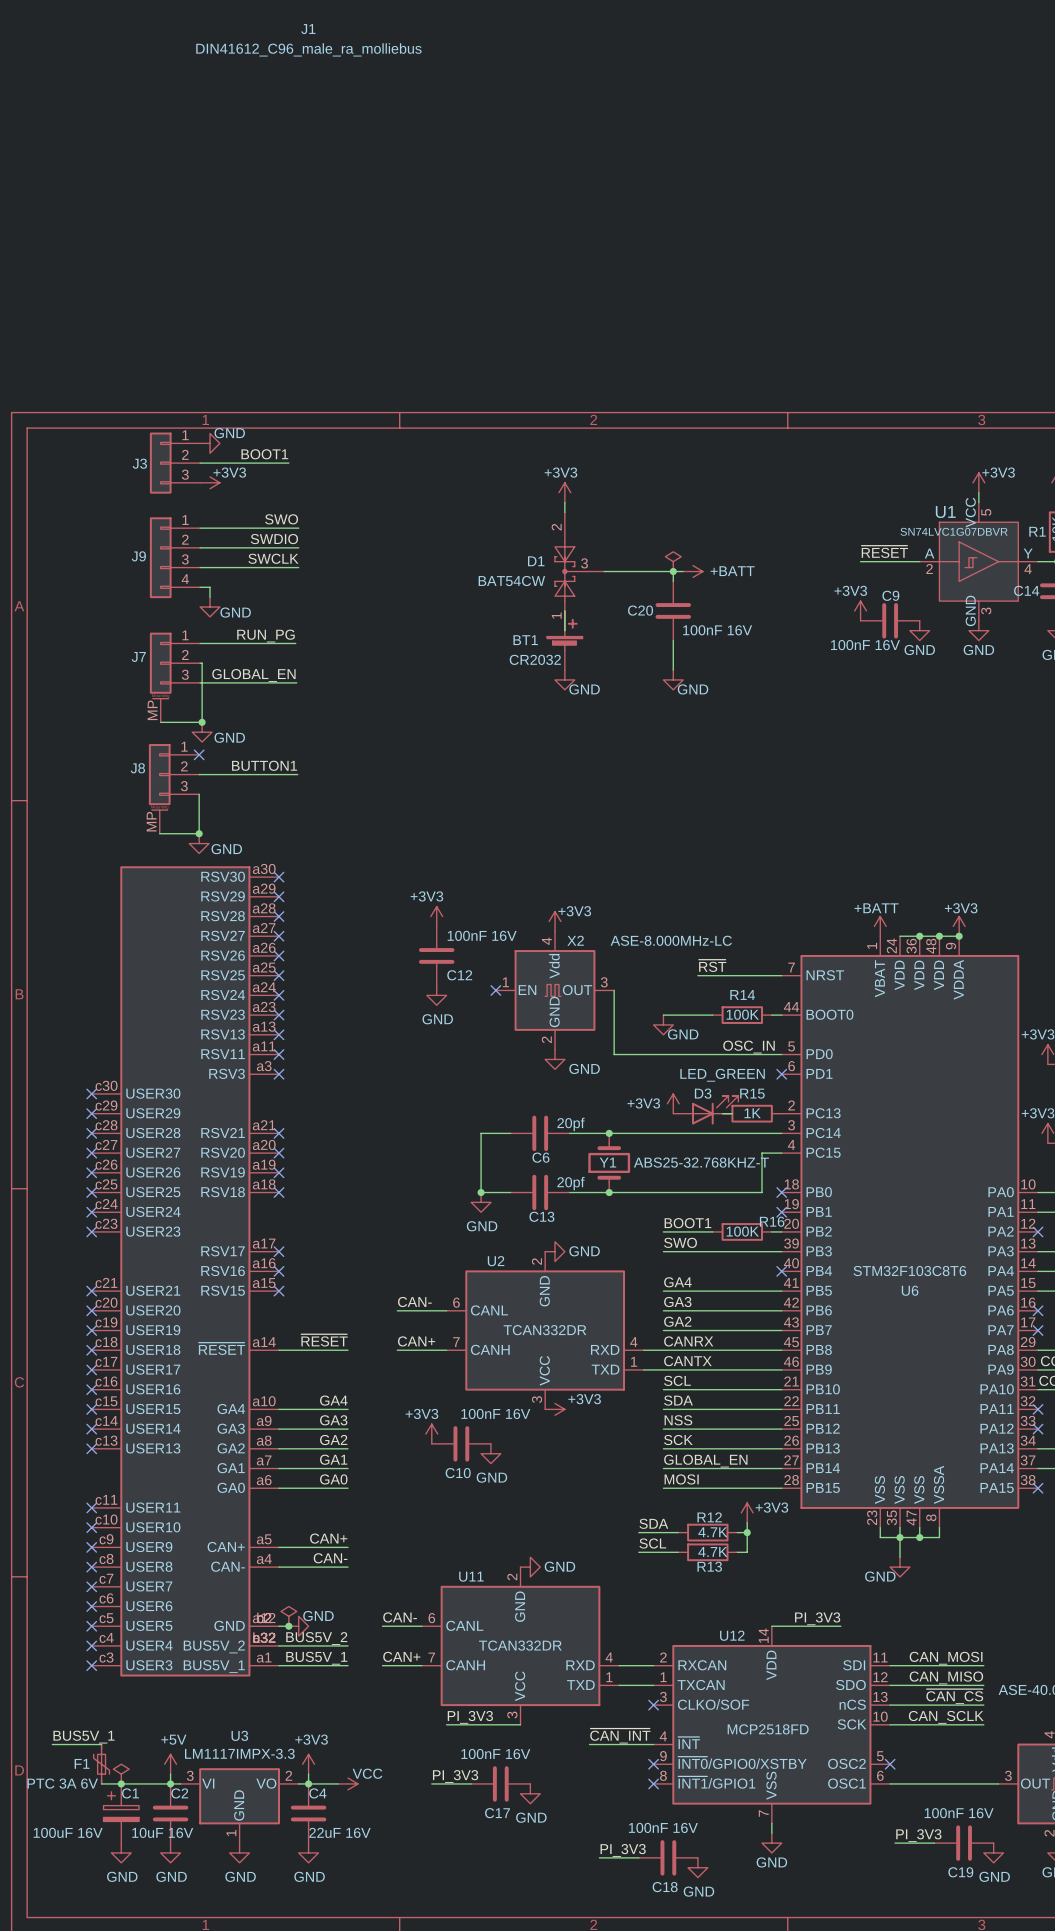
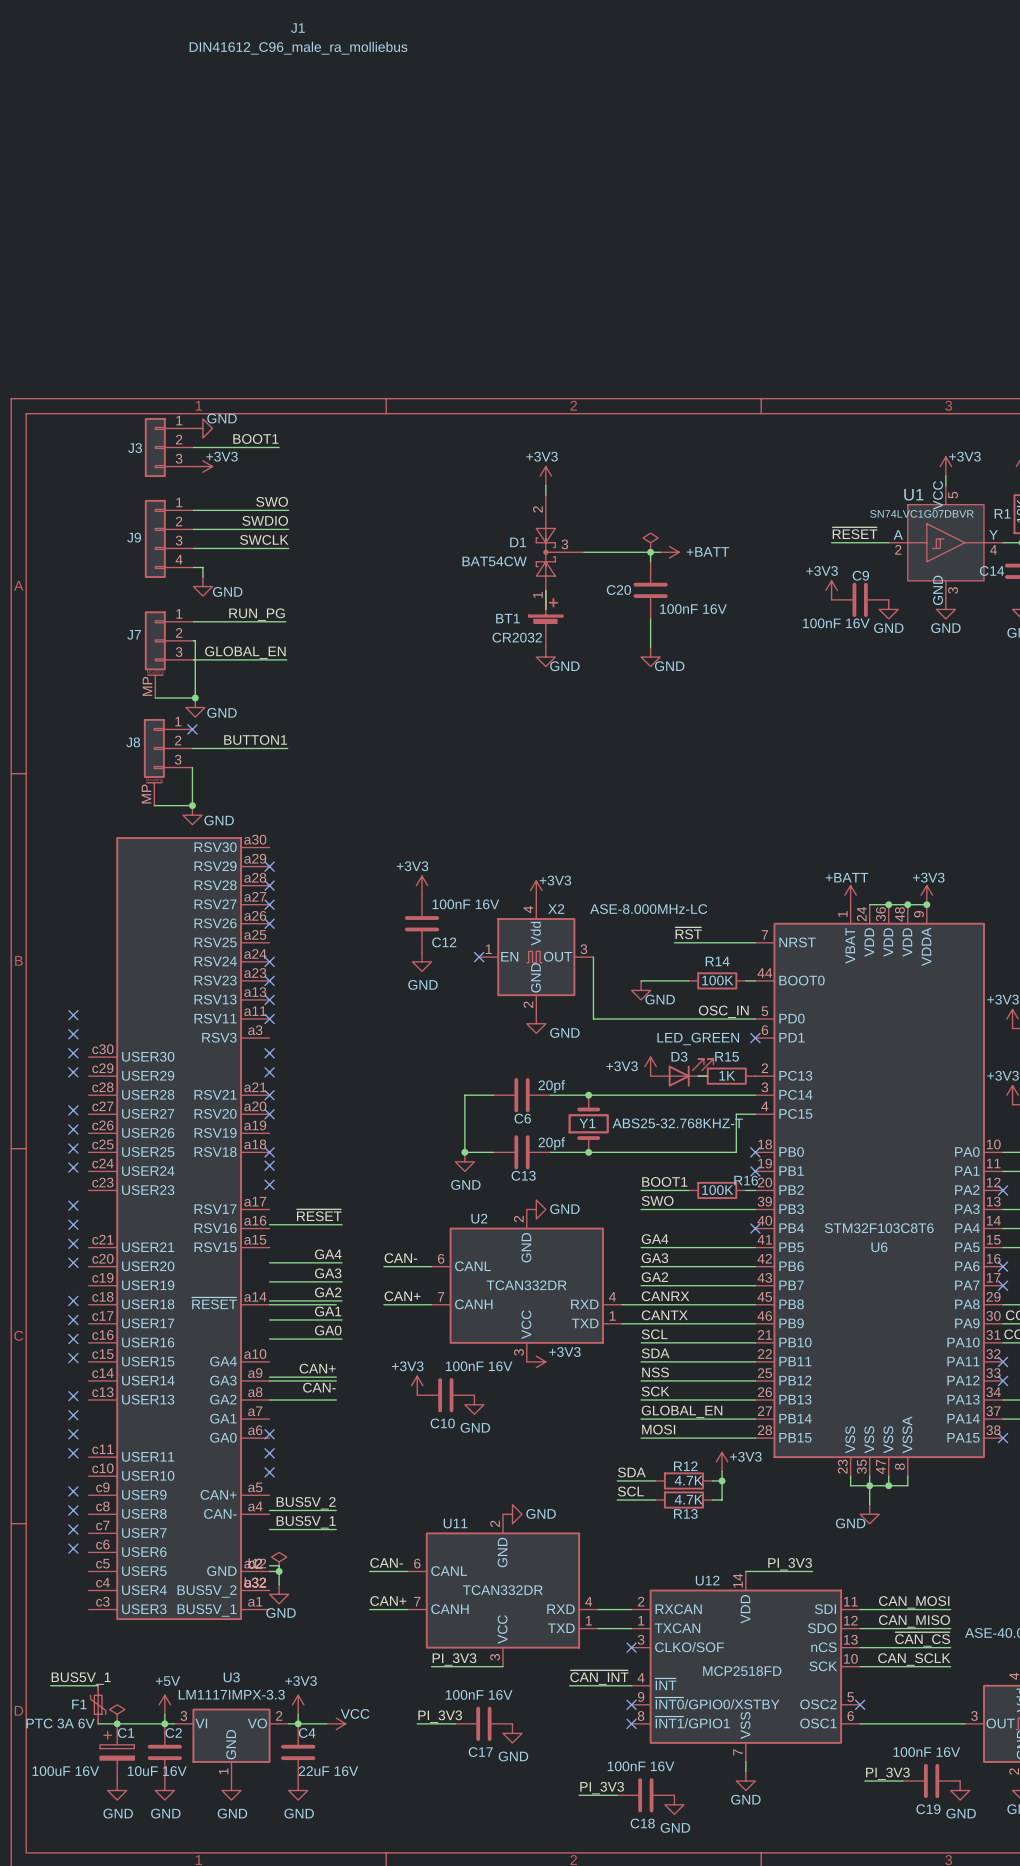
no-connect mark: (279, 877) -> none
no-connect mark: (279, 975) -> none
no-connect mark: none -> (73, 1015)
no-connect mark: none -> (73, 1034)
no-connect mark position: (279, 1074) -> (269, 1053)
no-connect mark: none -> (73, 1053)
no-connect mark: (91, 1093) -> none
no-connect mark: none -> (73, 1072)
no-connect mark: none -> (269, 1072)
no-connect mark: (91, 1113) -> none
no-connect mark: (91, 1133) -> none
no-connect mark: none -> (73, 1110)
no-connect mark: (91, 1153) -> none
no-connect mark: none -> (73, 1129)
no-connect mark: (91, 1172) -> none
no-connect mark: (279, 1172) -> none
no-connect mark: none -> (73, 1148)
no-connect mark: (91, 1192) -> none
no-connect mark: none -> (269, 1165)
no-connect mark: none -> (73, 1167)
no-connect mark: (91, 1212) -> none
no-connect mark: none -> (269, 1184)
no-connect mark: (91, 1231) -> none
no-connect mark: none -> (73, 1205)
no-connect mark: (279, 1251) -> none
no-connect mark: none -> (73, 1224)
wire: none -> (269, 1224) (341, 1224)
no-connect mark: (279, 1271) -> none
no-connect mark: none -> (73, 1243)
no-connect mark: (91, 1291) -> none
no-connect mark: (279, 1291) -> none
no-connect mark: none -> (73, 1262)
wire: none -> (269, 1262) (341, 1262)
no-connect mark: (91, 1310) -> none
wire: none -> (269, 1281) (341, 1281)
no-connect mark: (91, 1330) -> none
label position: ~{RESET} (324, 1340) -> ~{RESET} (319, 1215)
no-connect mark: none -> (73, 1300)
wire: none -> (269, 1300) (341, 1300)
no-connect mark: (91, 1350) -> none
no-connect mark: none -> (73, 1319)
wire: none -> (269, 1319) (341, 1319)
no-connect mark: (91, 1369) -> none
no-connect mark: none -> (73, 1339)
wire: none -> (269, 1339) (341, 1339)
no-connect mark: (91, 1389) -> none
label position: GA4 (333, 1400) -> GA4 (328, 1254)
no-connect mark: none -> (73, 1358)
no-connect mark: (91, 1409) -> none
wire: (279, 1409) (348, 1409) -> (269, 1377) (336, 1377)
label position: GA3 (333, 1420) -> GA3 (328, 1273)
no-connect mark: (91, 1429) -> none
label position: GA2 (333, 1440) -> GA2 (328, 1292)
no-connect mark: none -> (73, 1396)
no-connect mark: (91, 1448) -> none
label position: GA1 (333, 1459) -> GA1 (328, 1311)
no-connect mark: none -> (73, 1415)
wire: (279, 1468) (348, 1468) -> none
label position: GA0 (333, 1479) -> GA0 (328, 1330)
no-connect mark: none -> (73, 1434)
no-connect mark: none -> (269, 1434)
wire: (279, 1488) (348, 1488) -> none
no-connect mark: none -> (73, 1453)
no-connect mark: none -> (269, 1453)
no-connect mark: (91, 1507) -> none
no-connect mark: none -> (269, 1472)
no-connect mark: (91, 1527) -> none
label position: CAN+ (328, 1538) -> CAN+ (317, 1368)
no-connect mark: none -> (73, 1491)
no-connect mark: (91, 1547) -> none
wire: (279, 1547) (348, 1547) -> (269, 1510) (336, 1510)
label position: CAN- (330, 1558) -> CAN- (319, 1387)
no-connect mark: none -> (73, 1510)
no-connect mark: (91, 1567) -> none
wire: (279, 1567) (348, 1567) -> (269, 1529) (336, 1529)
no-connect mark: none -> (73, 1529)
no-connect mark: (91, 1586) -> none
no-connect mark: none -> (73, 1548)
no-connect mark: (91, 1606) -> none
wire: none -> (269, 1565) (279, 1565) (279, 1584)
no-connect mark: (91, 1626) -> none
power symbol rotation: 0° (298, 1626) -> 90° clockwise (279, 1594)
power symbol position: GND (298, 1626) -> GND (279, 1594)
label position: BUS5V_2 (316, 1638) -> BUS5V_2 (306, 1503)
no-connect mark: (91, 1645) -> none
wire: (279, 1645) (348, 1645) -> none
label position: BUS5V_1 (316, 1658) -> BUS5V_1 (306, 1522)
no-connect mark: (91, 1665) -> none
wire: (279, 1665) (348, 1665) -> none

